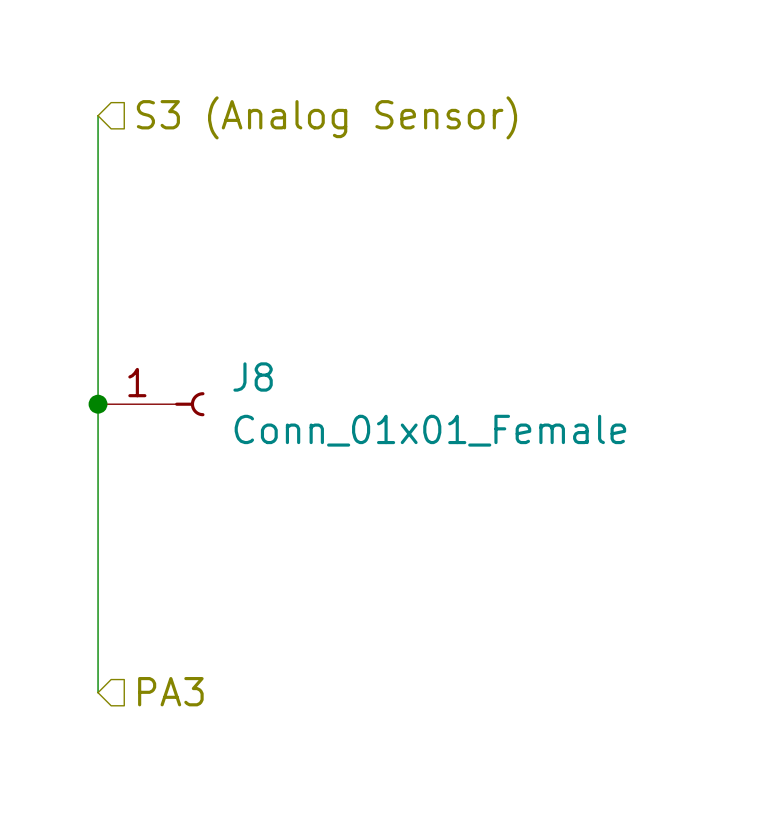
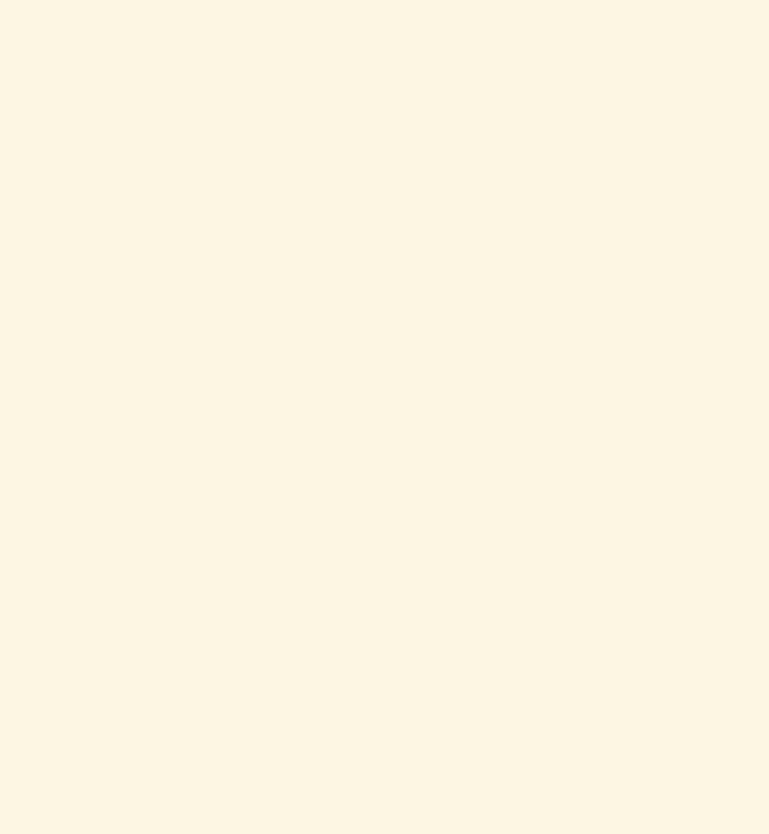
wire: (98, 115) (98, 692) -> none
hierarchical label: S3 (Analog Sensor) (326, 117) -> none
junction: (98, 404) -> none
J8: Conn_01x01_Female (151, 404) -> none
hierarchical label: PA3 (170, 691) -> none

